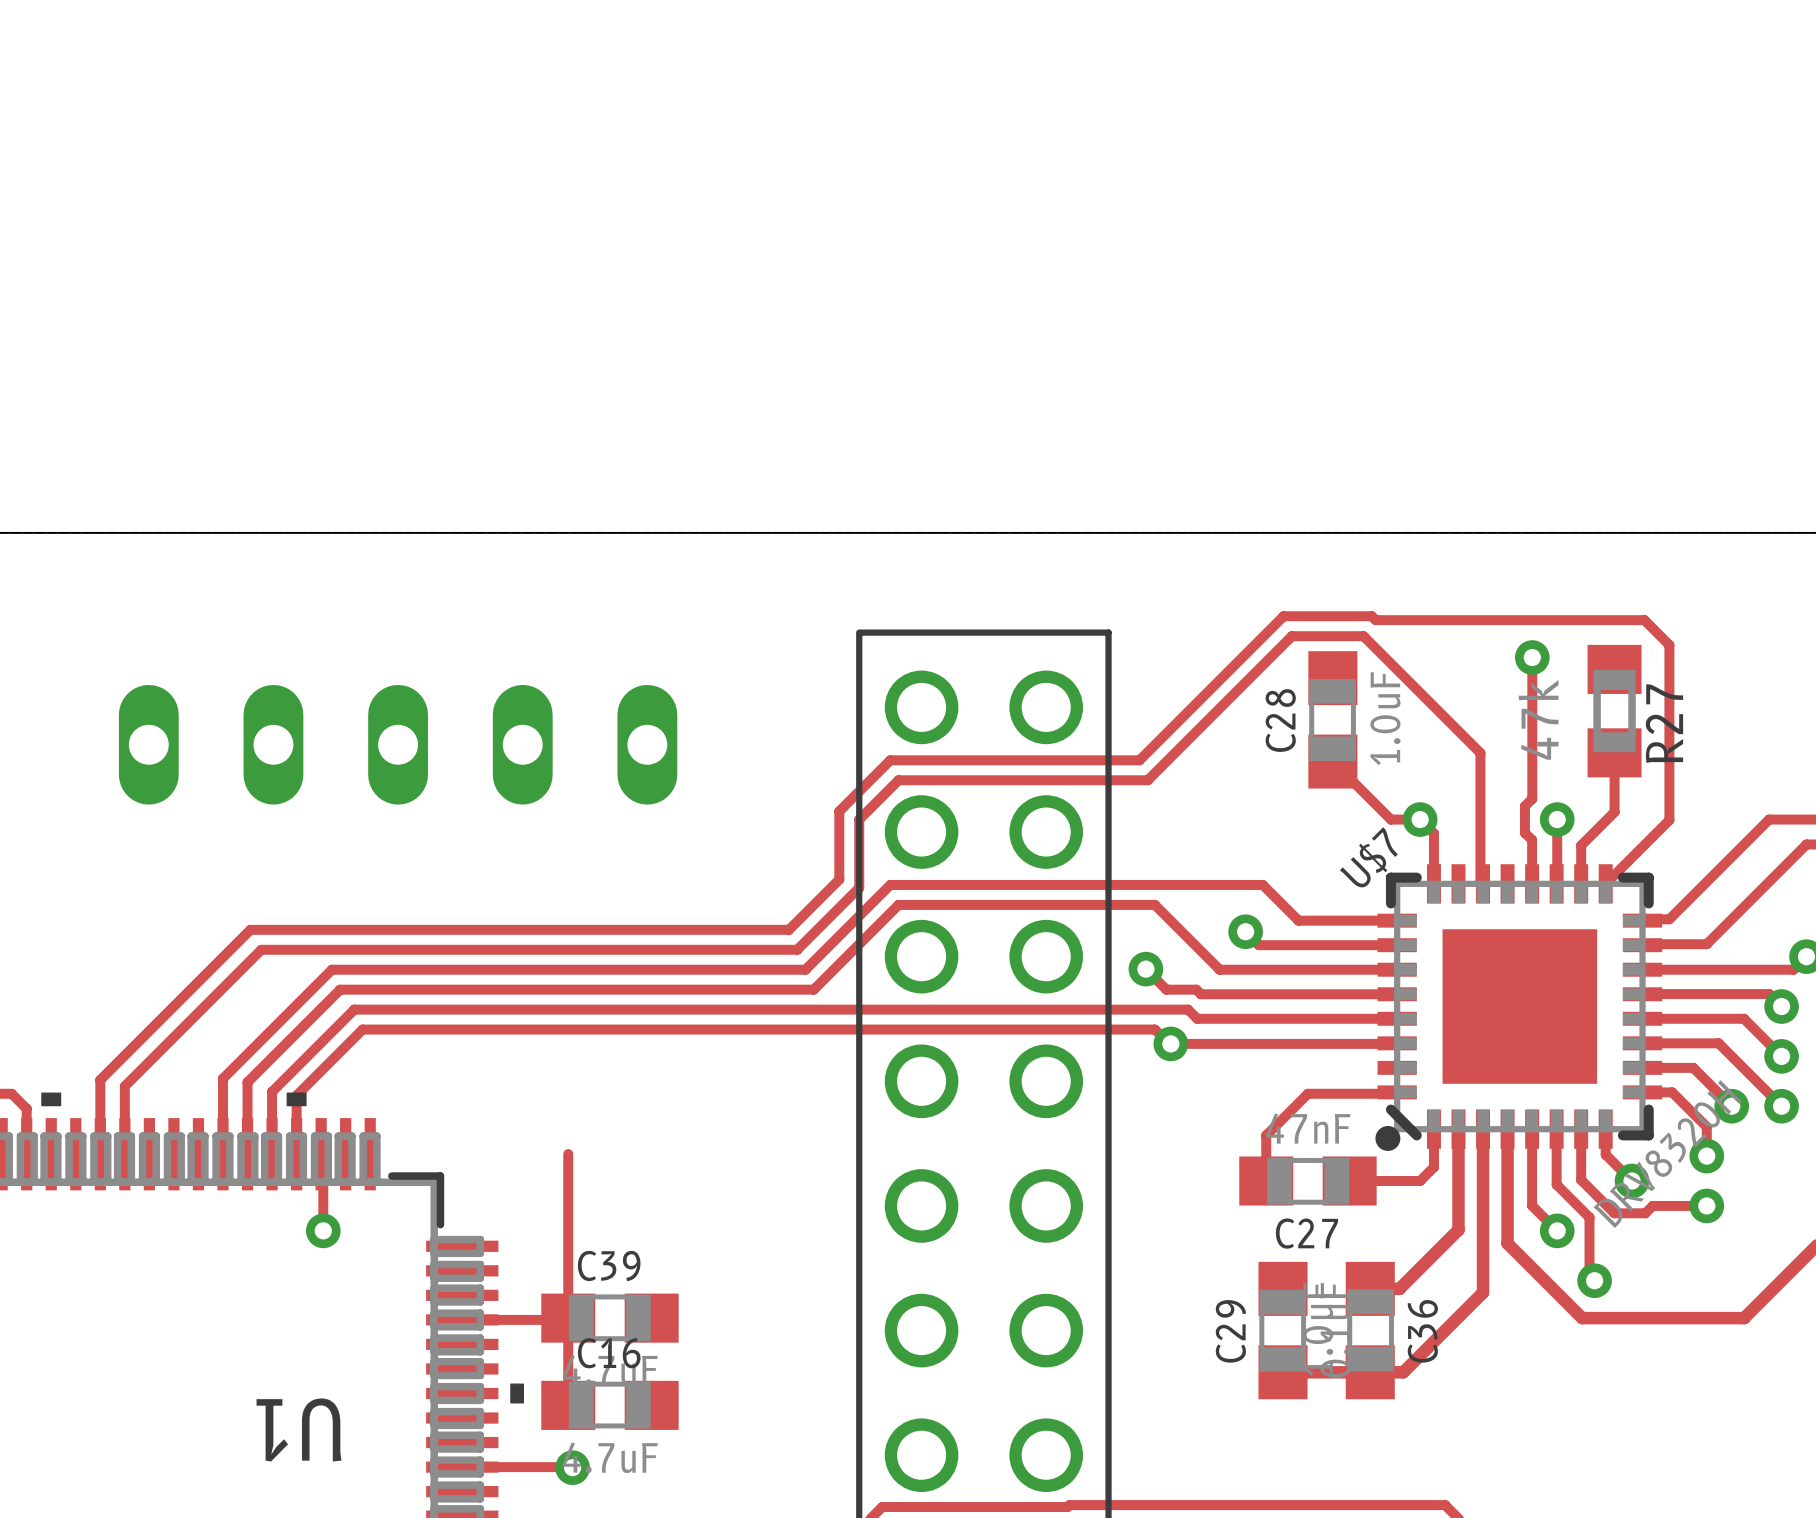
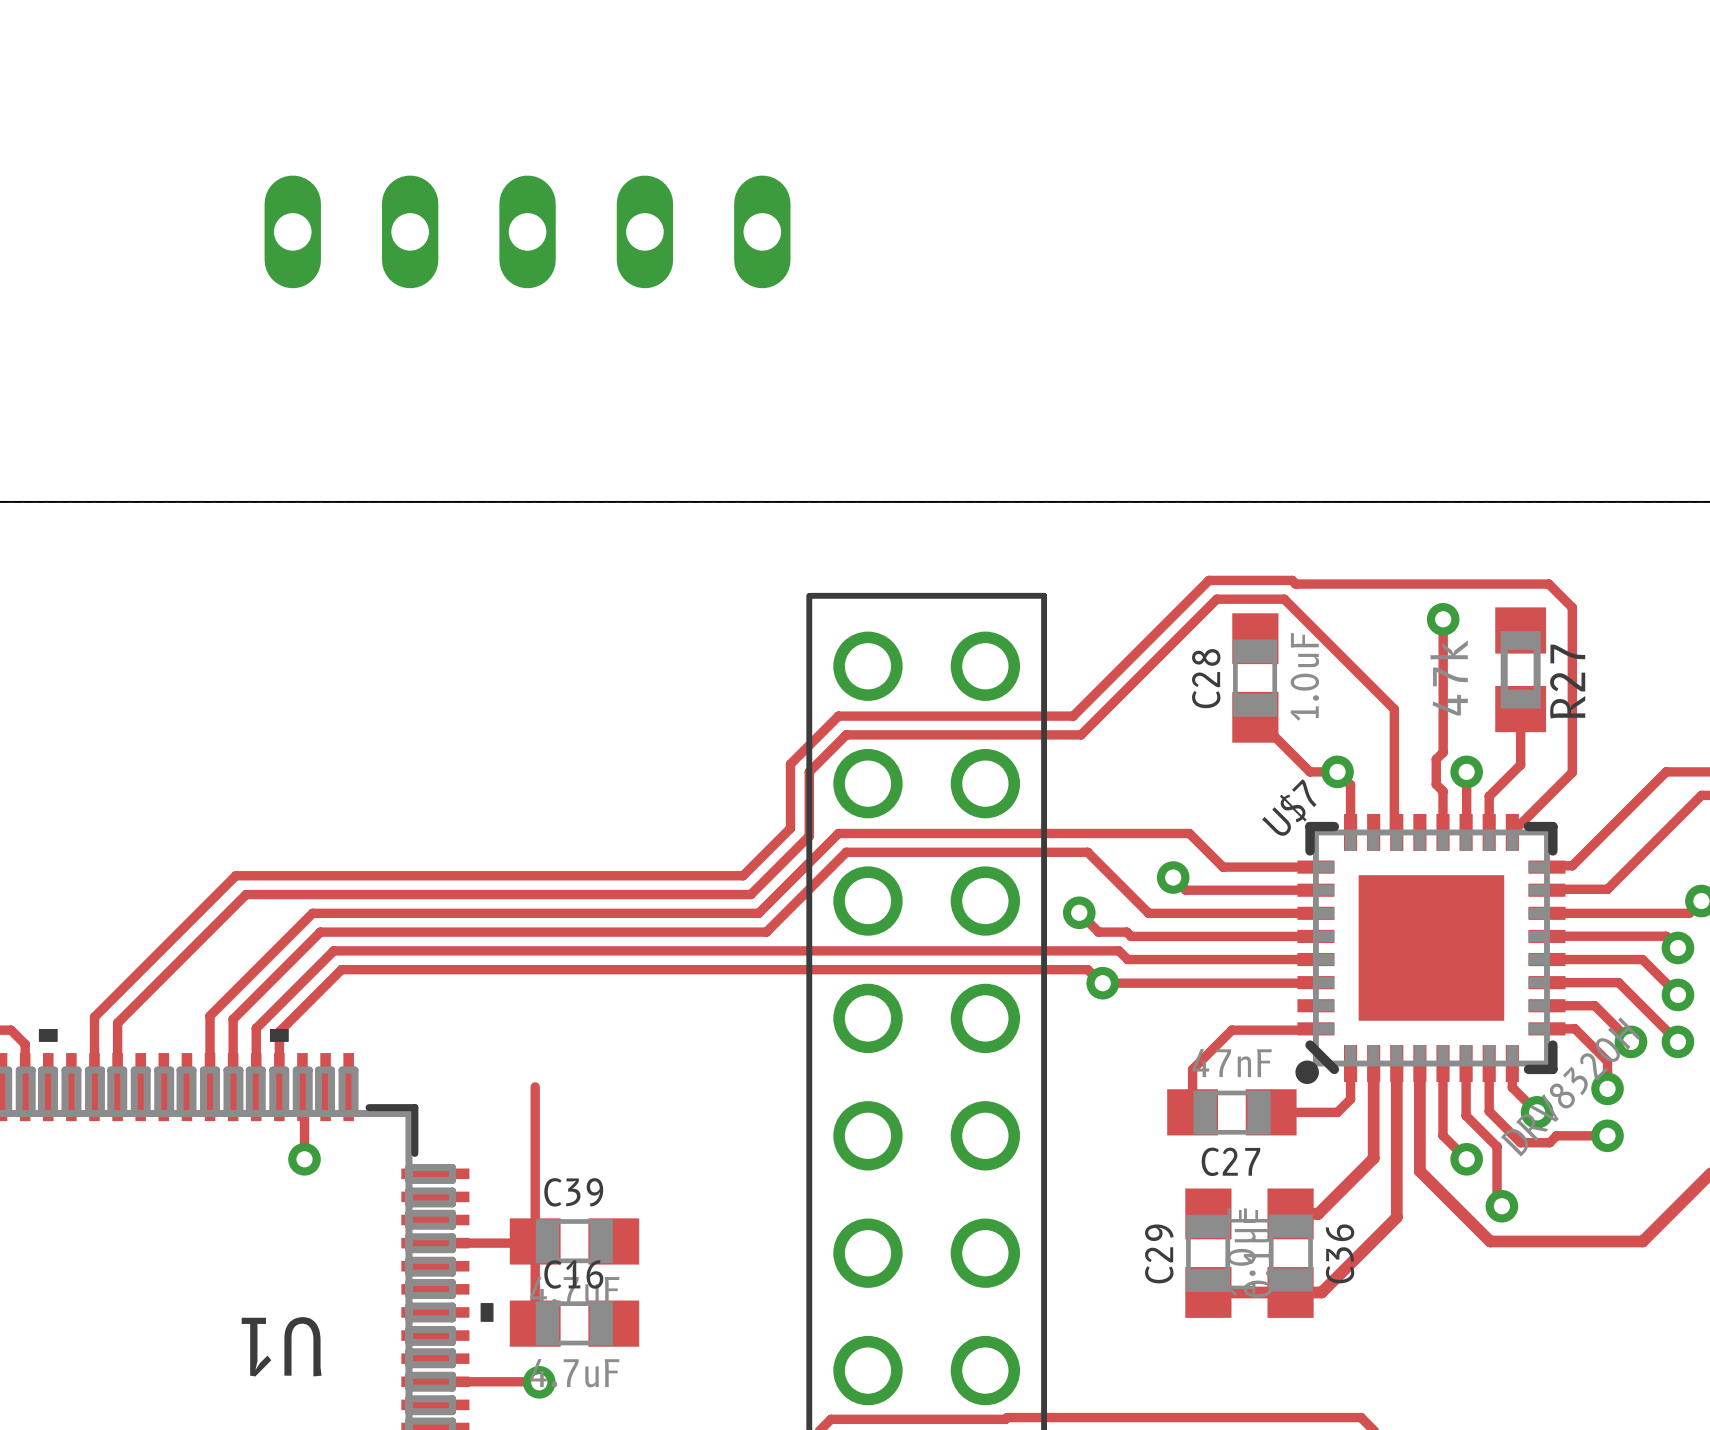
part position: (398, 744) -> (527, 231)

